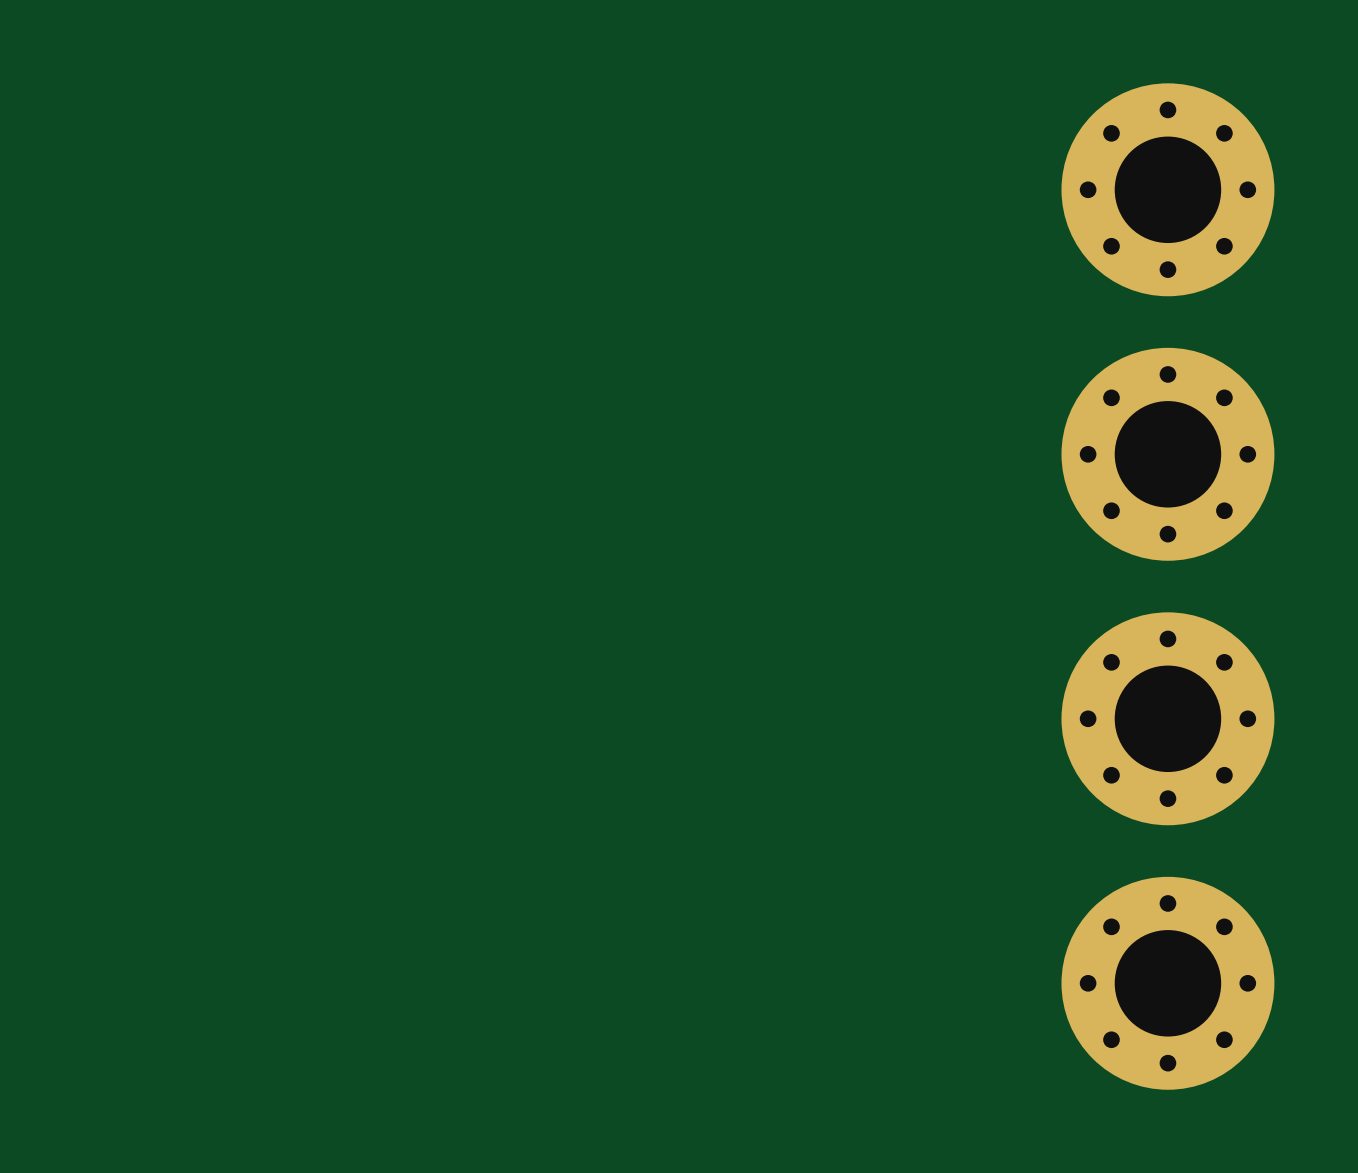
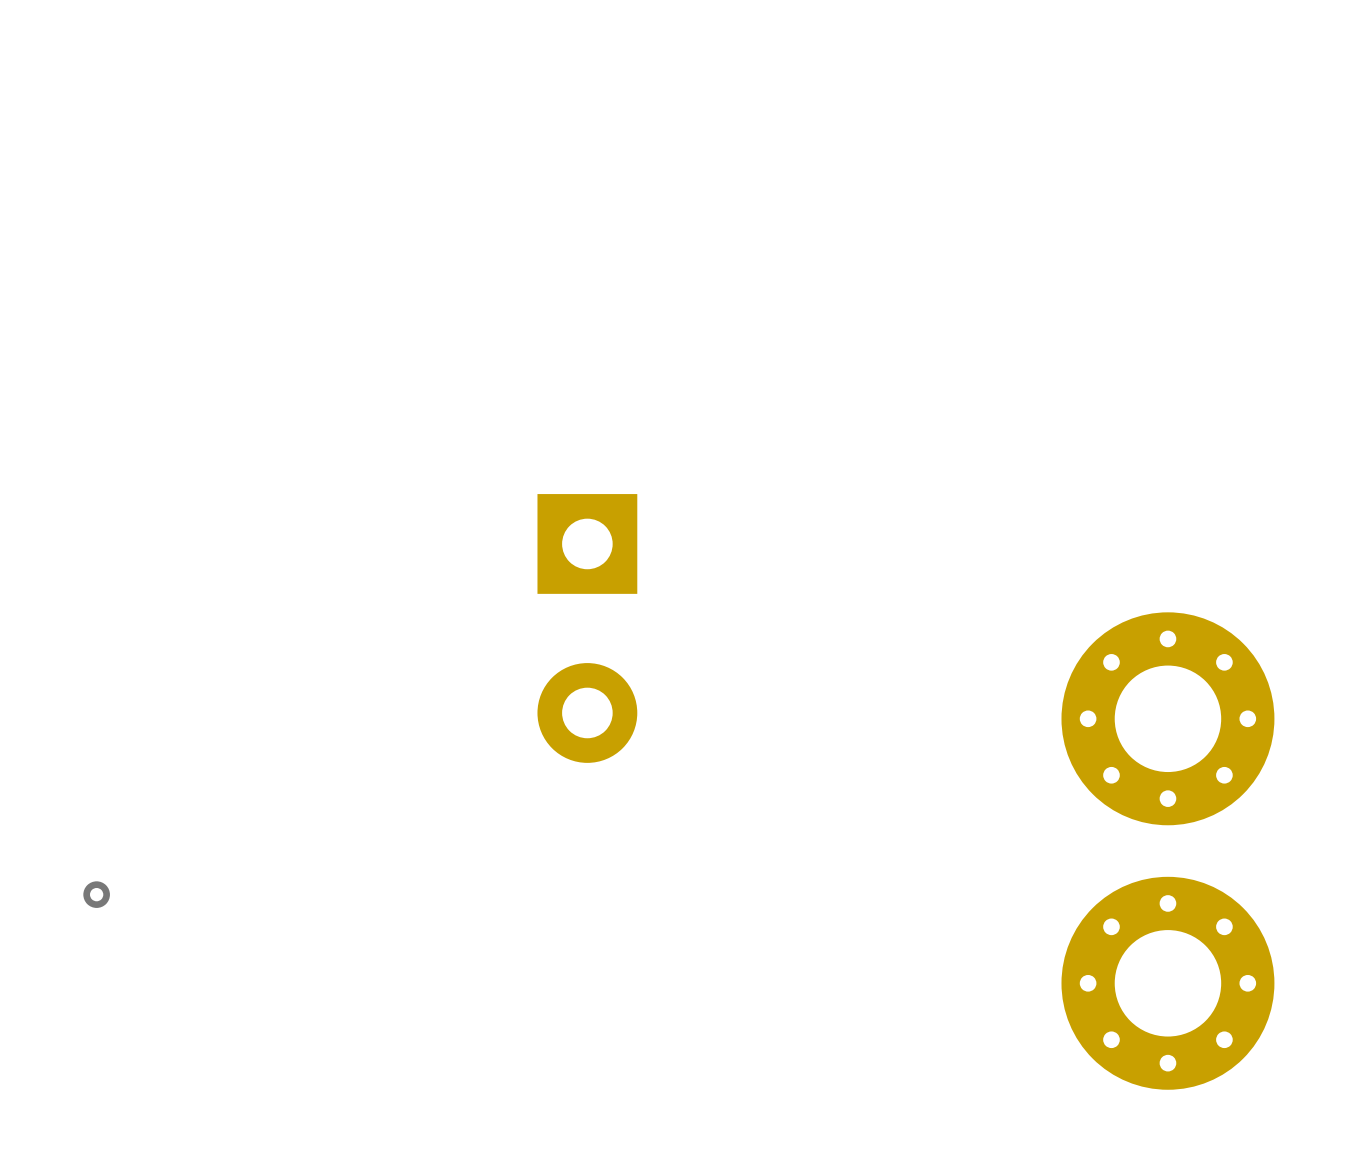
part: (1167, 189) -> none
part: (1167, 454) -> none
part: none -> (587, 628)
via: none -> (96, 894)

